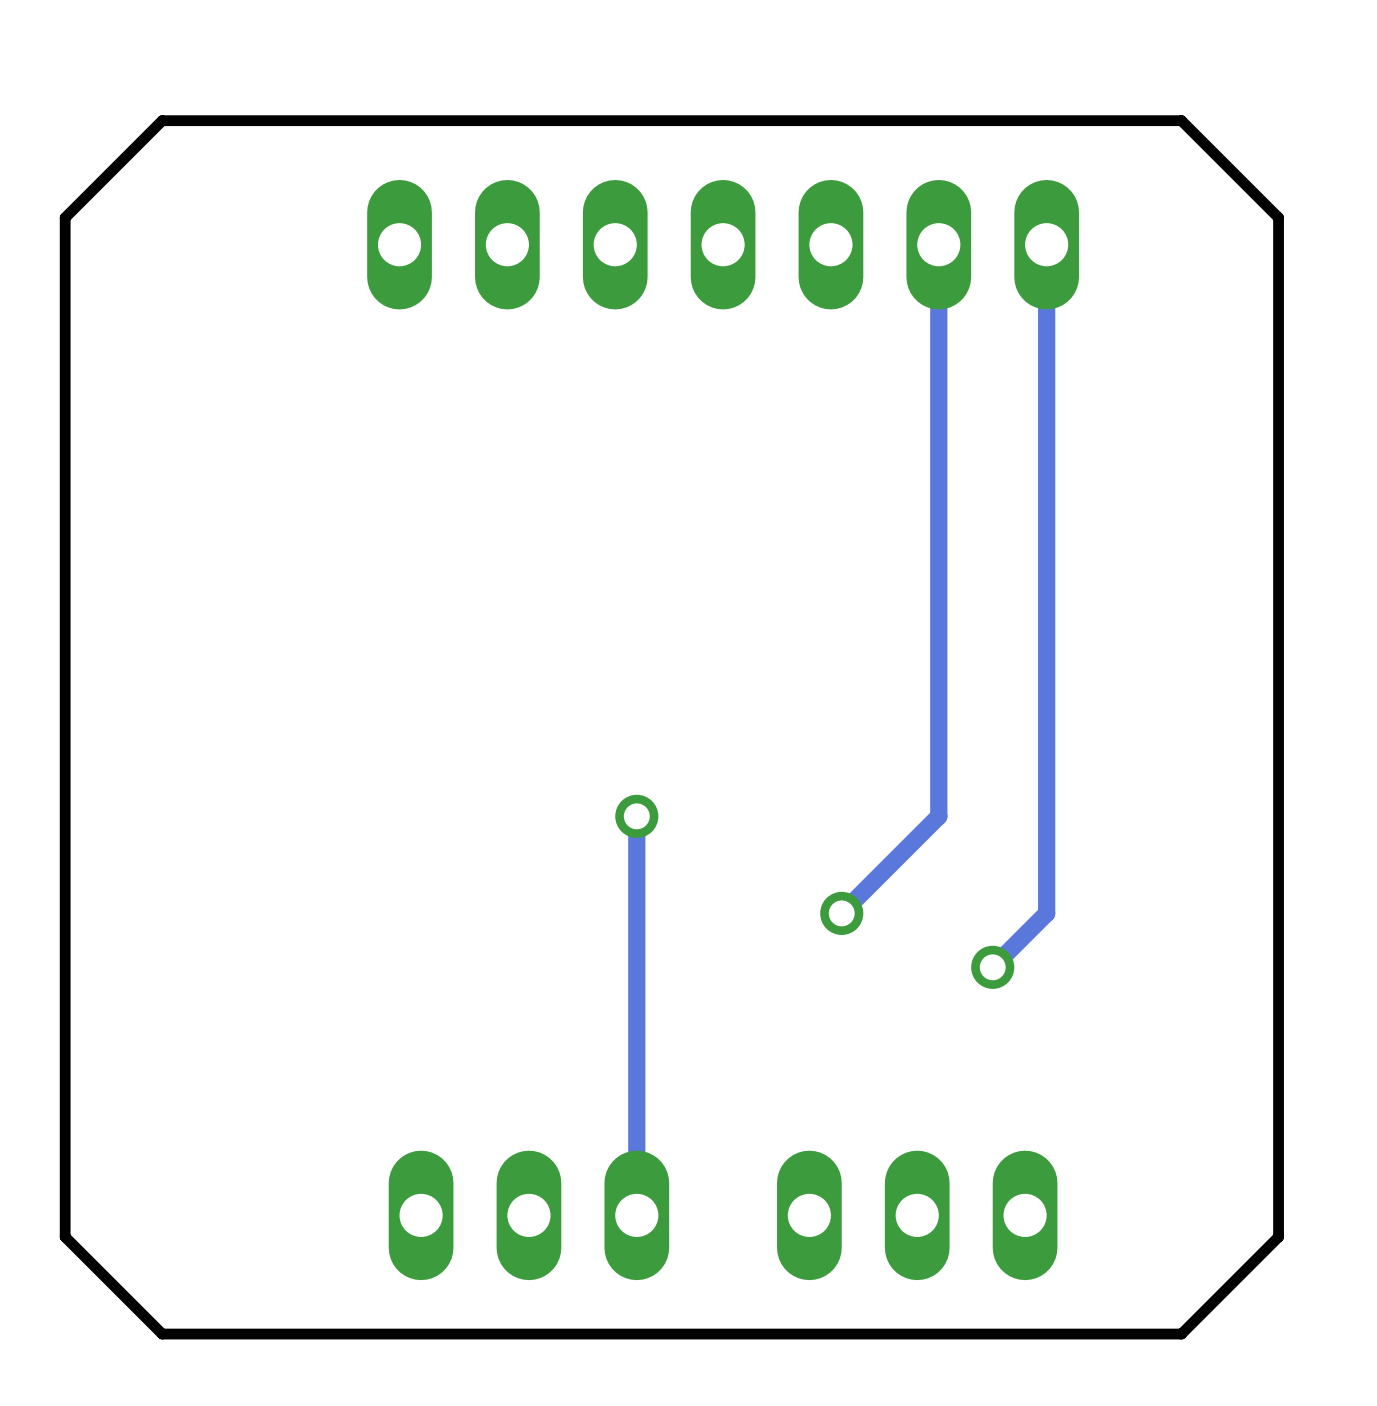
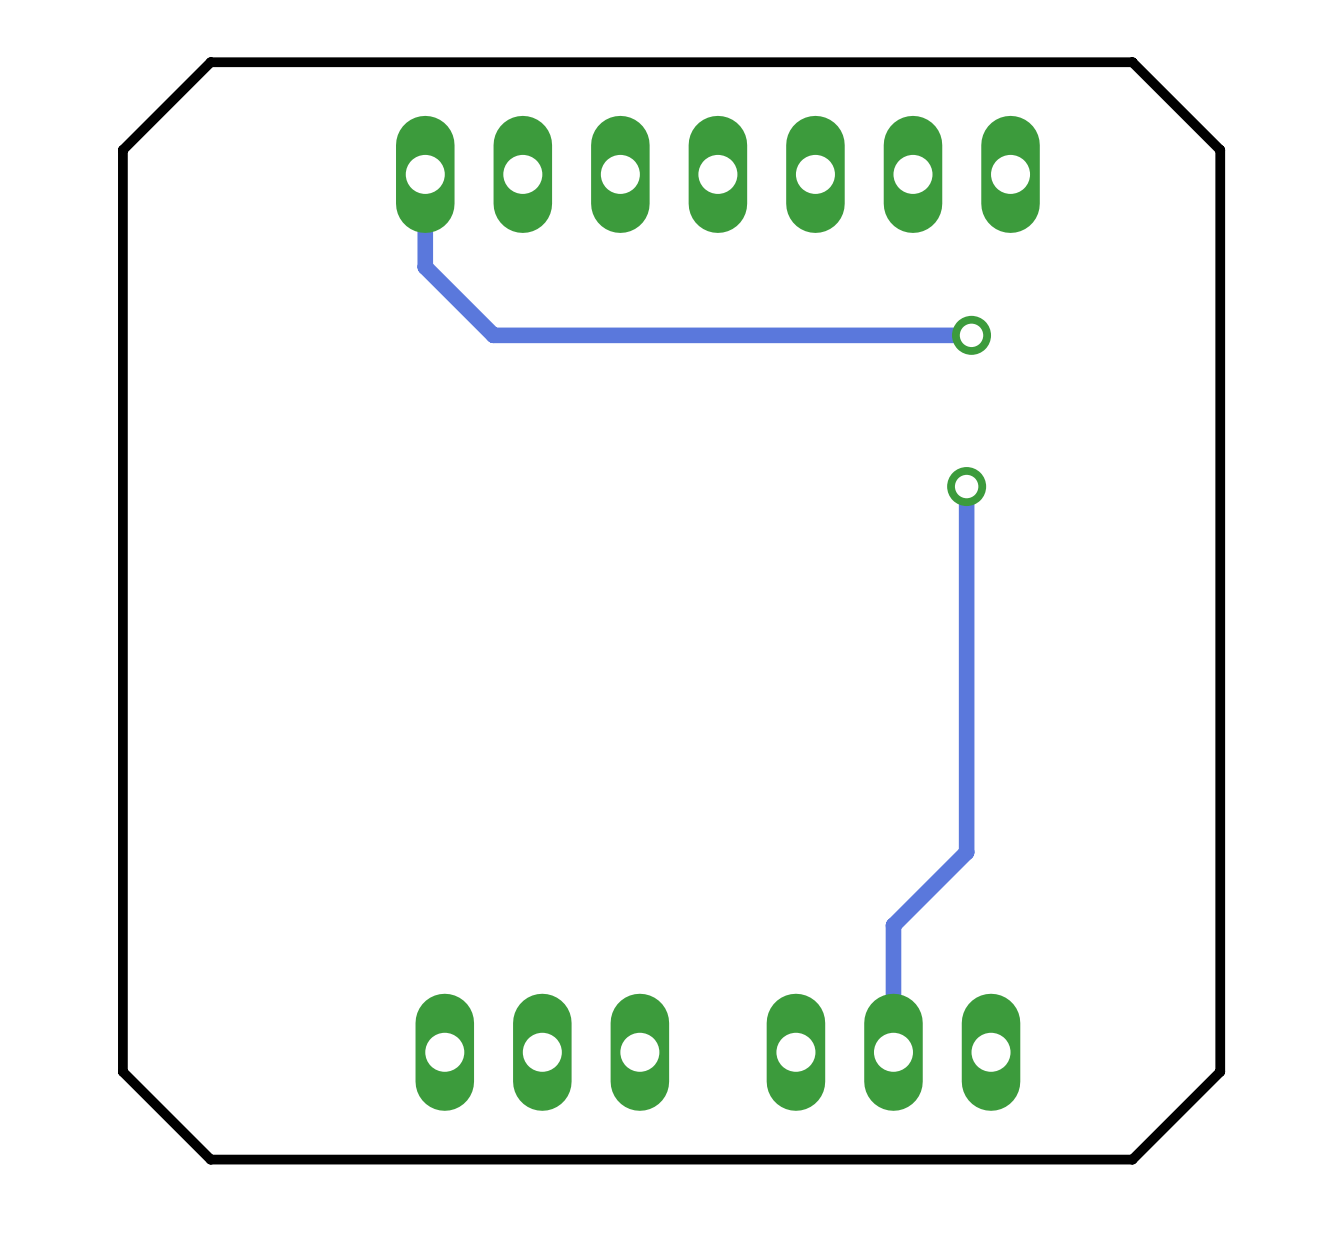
track: none -> (425, 174) (425, 267) (493, 335) (971, 335)
track: (938, 244) (938, 816) (841, 913) -> none
track: (1046, 244) (1046, 913) (992, 967) -> none
via: none -> (971, 335)
track: none -> (966, 486) (966, 852) (893, 925) (893, 1052)
via: none -> (966, 486)
track: (636, 816) (636, 1215) -> none
via: (636, 816) -> none
via: (841, 913) -> none
via: (992, 967) -> none

